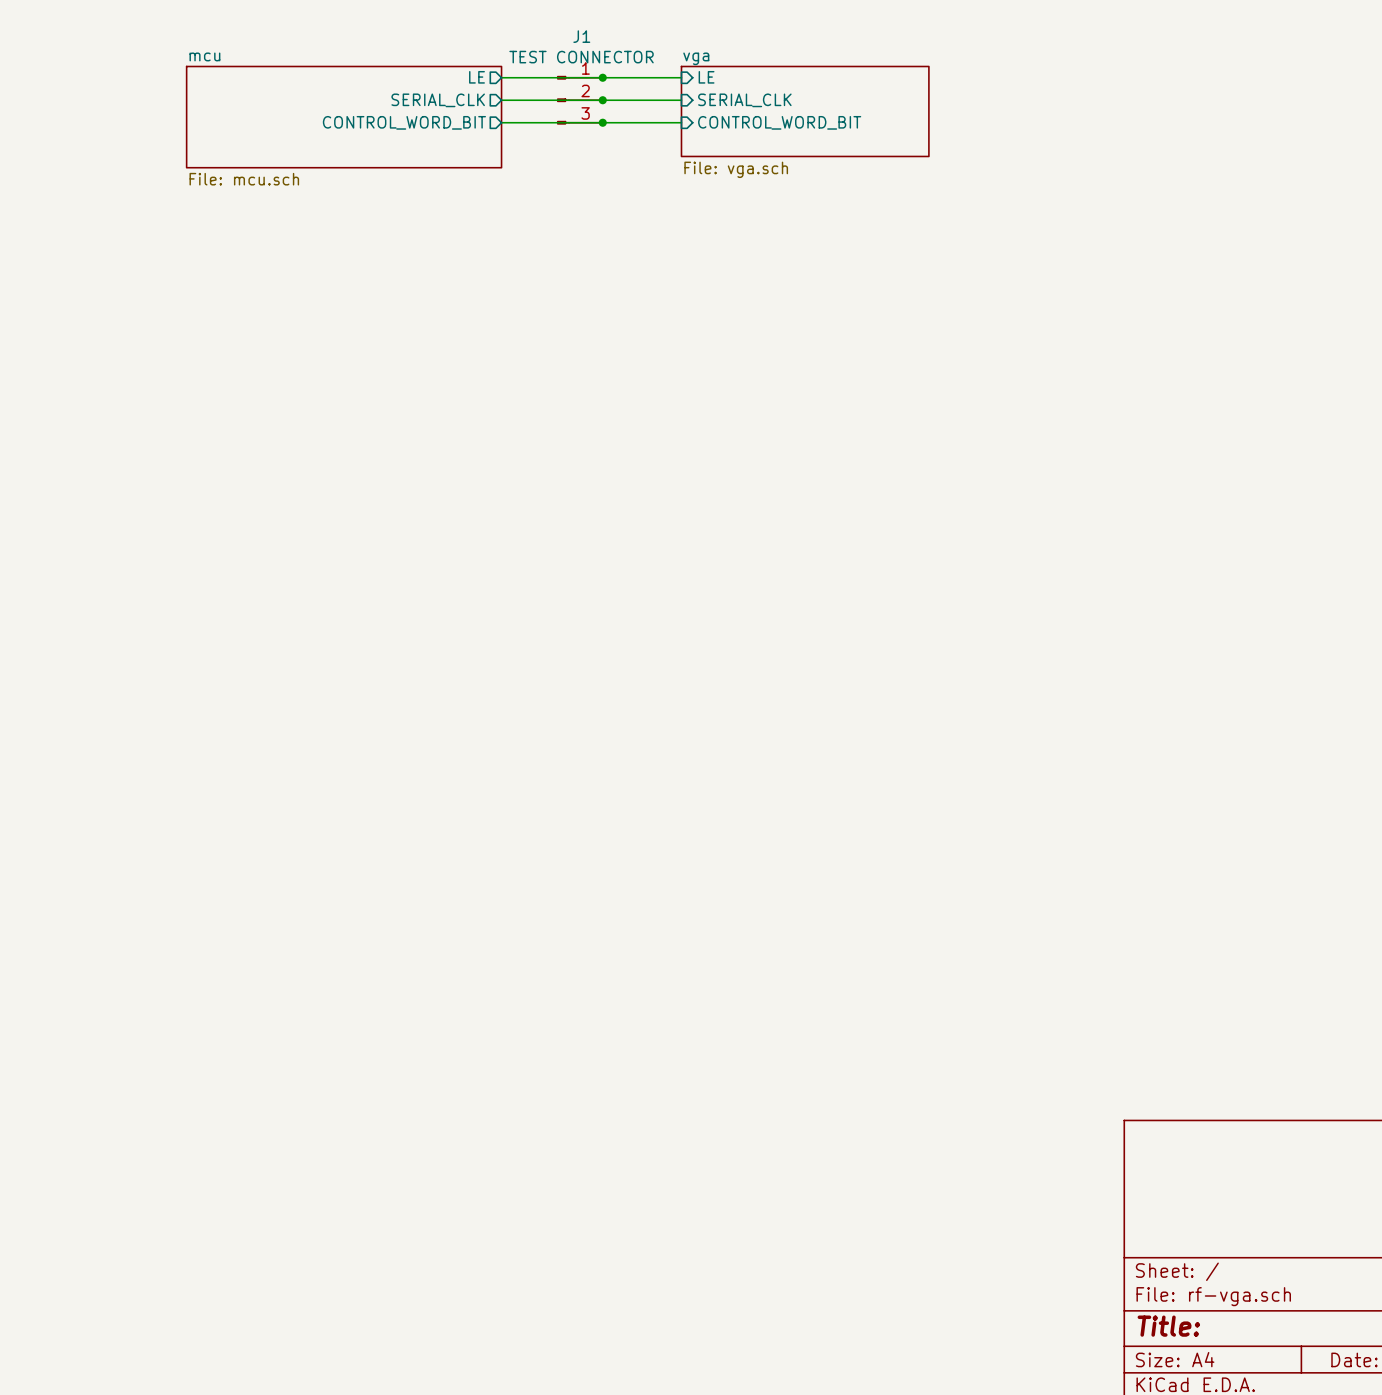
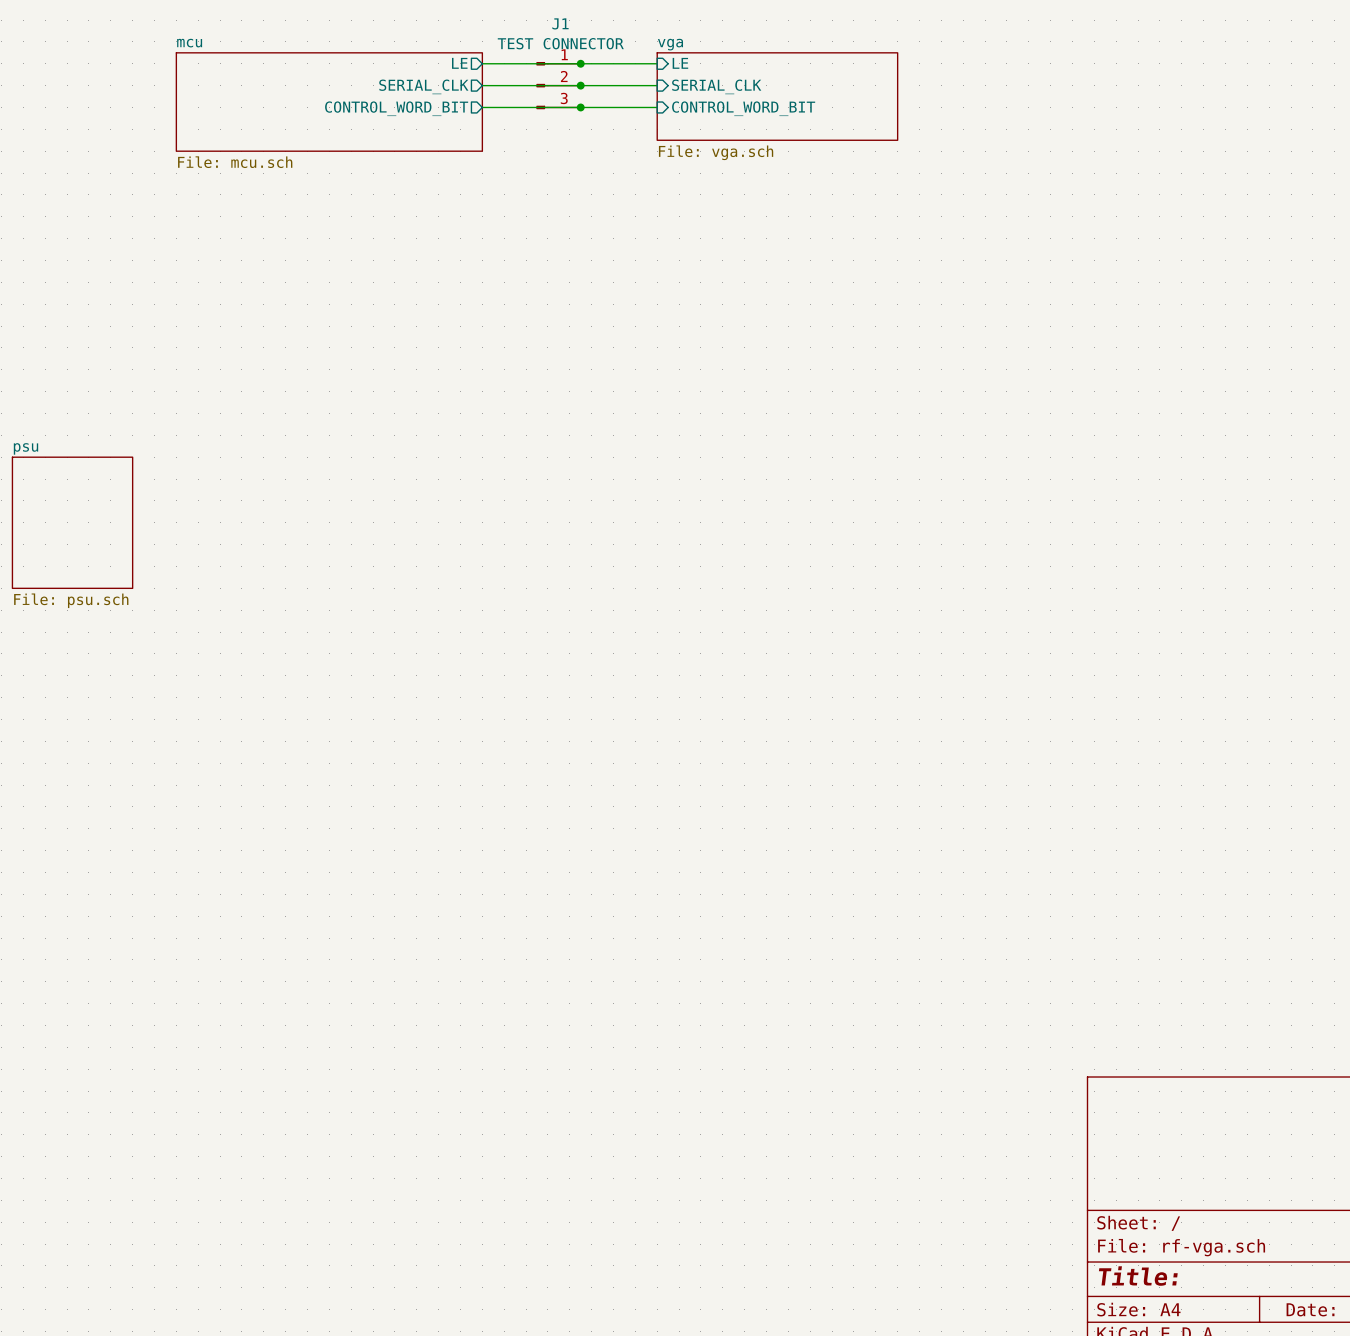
sheet psu: none -> File: psu.sch (72, 522)

